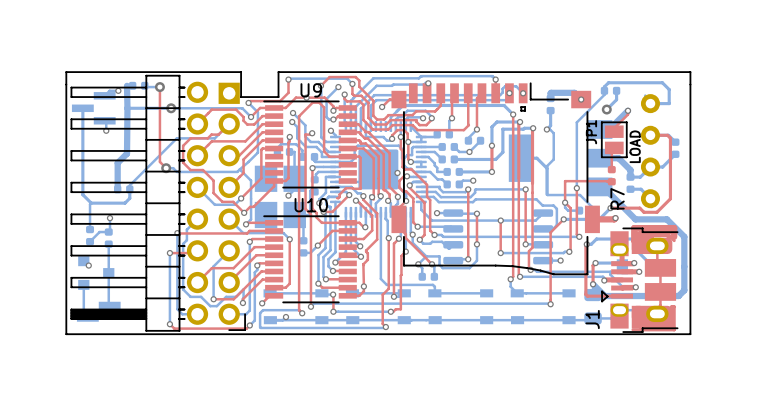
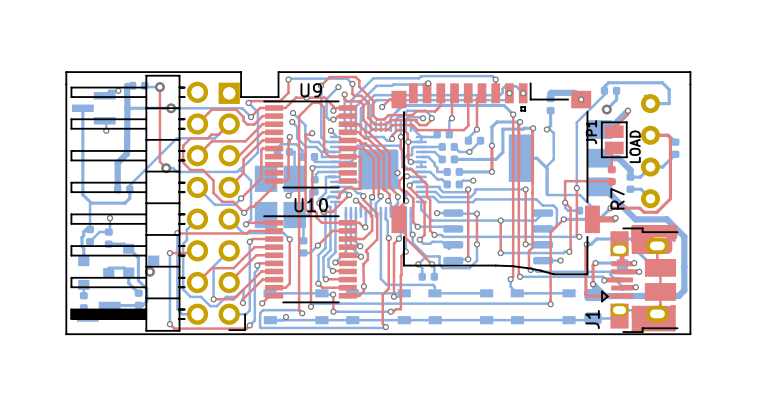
bottom track: none -> (90, 229) (86, 229) (81, 237) (83, 256)
bottom track: (108, 244) (108, 304) -> (108, 244) (124, 244) (138, 257) (138, 280) (146, 288) (146, 301) (142, 305) (109, 305)
part: none -> (141, 260)
via: (88, 265) -> none
bottom track: none -> (108, 268) (124, 268) (128, 272) (128, 283) (138, 293)
via: none -> (149, 271)
bottom track: (83, 295) (83, 307) -> none
part: none -> (138, 299)
part: none -> (83, 301)

